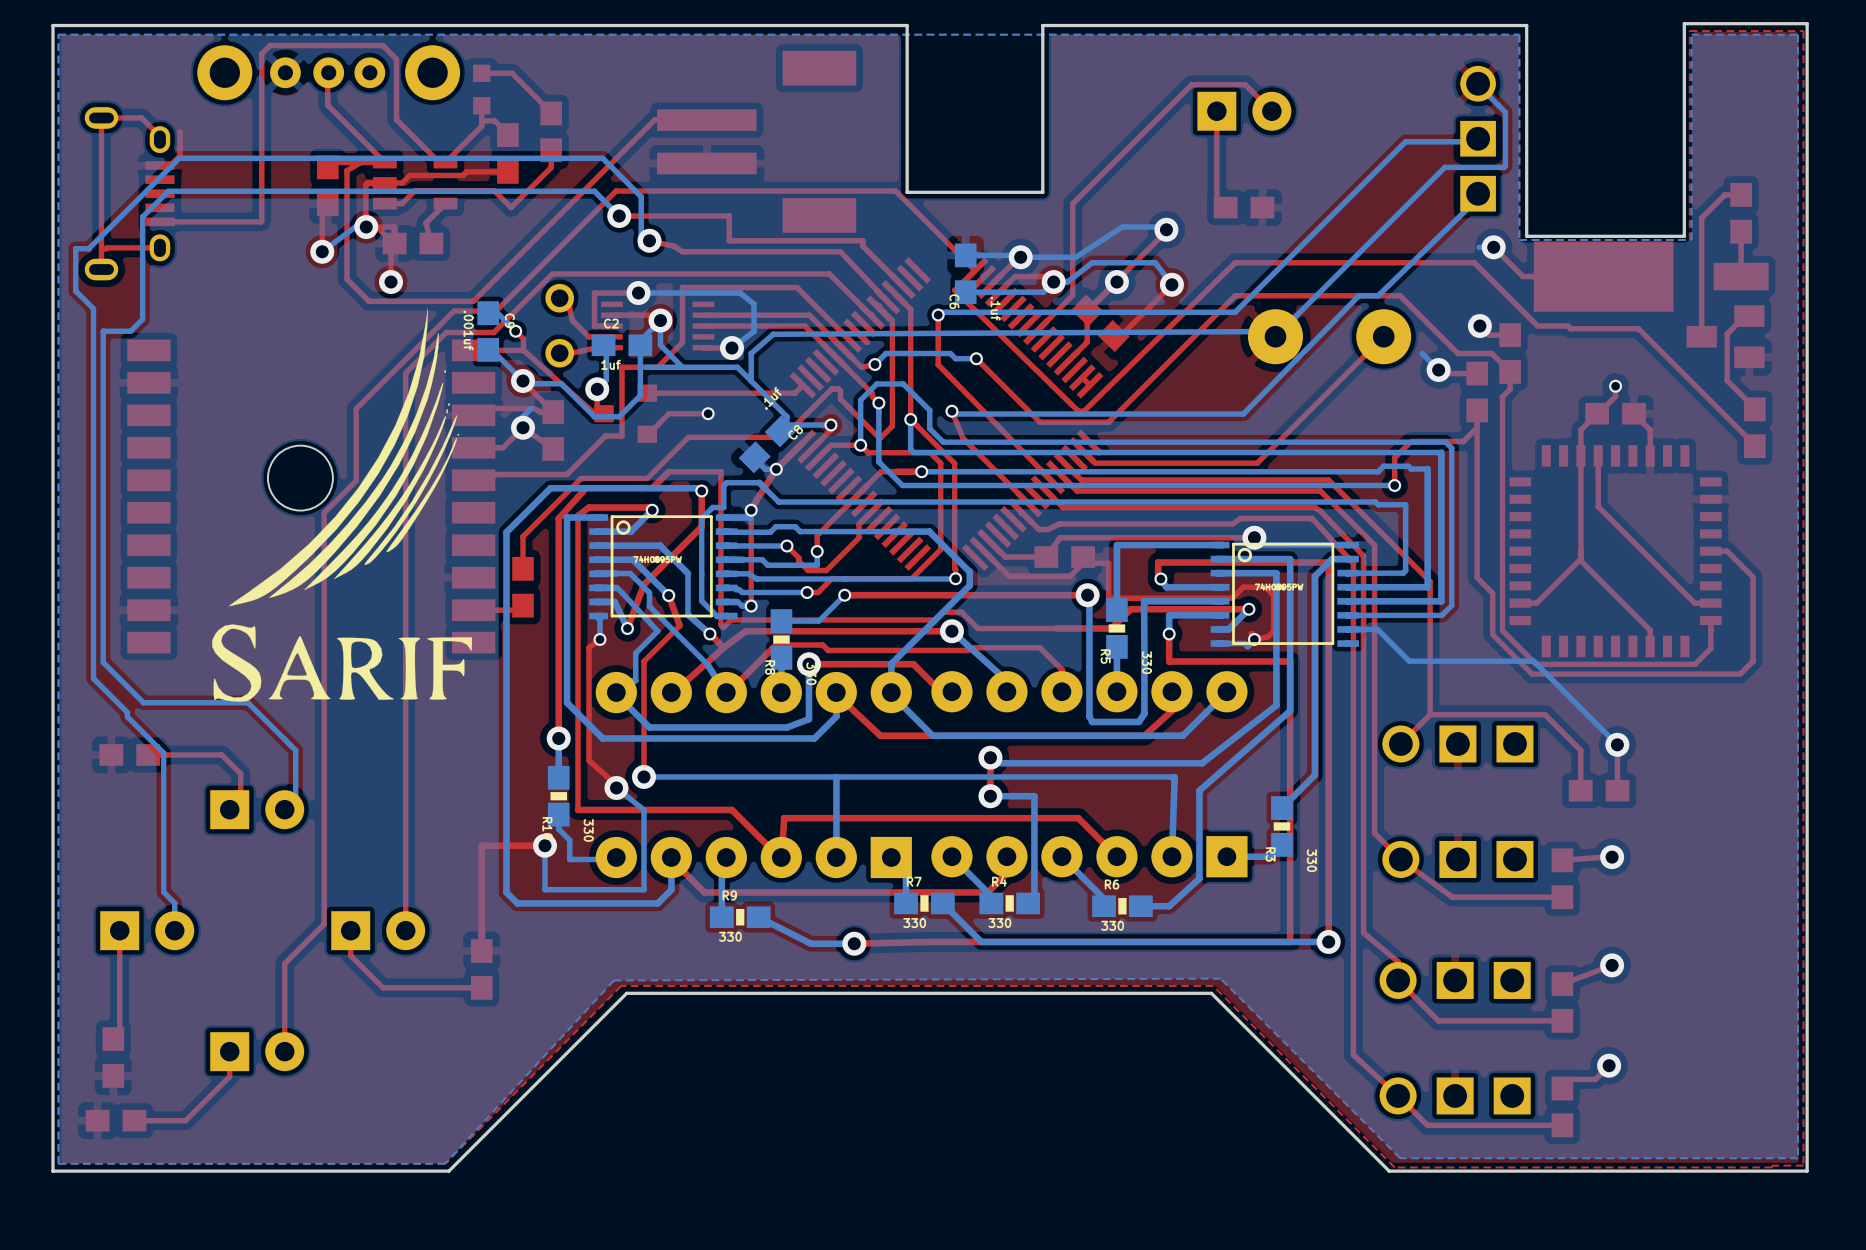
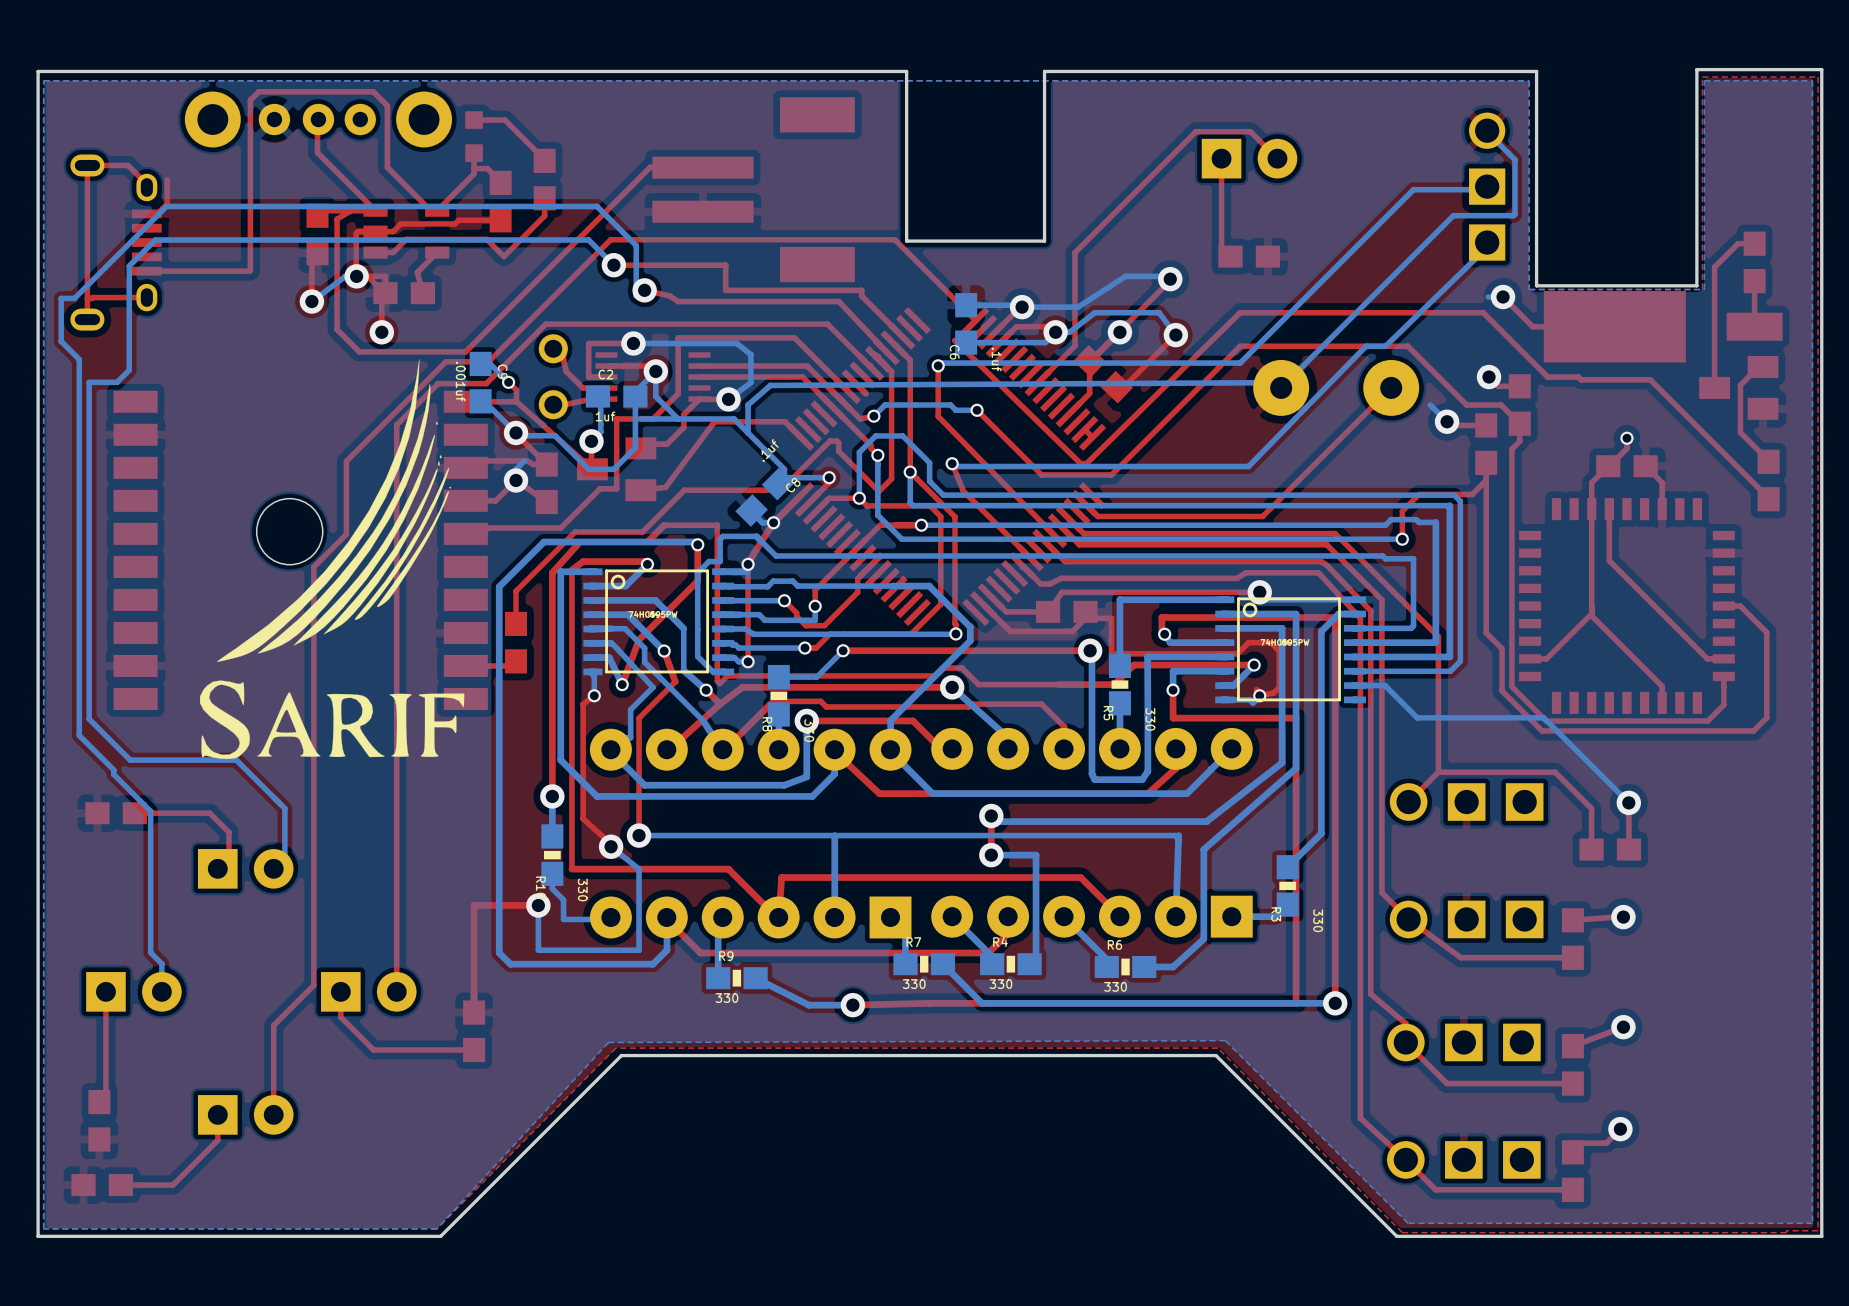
top track: none -> (699, 399) (683, 414) (683, 427) (666, 444) (633, 444) (640, 448)
part footprint: [594, 384, 658, 443] -> [577, 437, 657, 502]
top track: (802, 385) (795, 393) (647, 393) -> (800, 437) (785, 421) (714, 421) (665, 487) (640, 490)
top track: (708, 413) (668, 413) (648, 434) (647, 432) -> none
via: (708, 413) -> none

